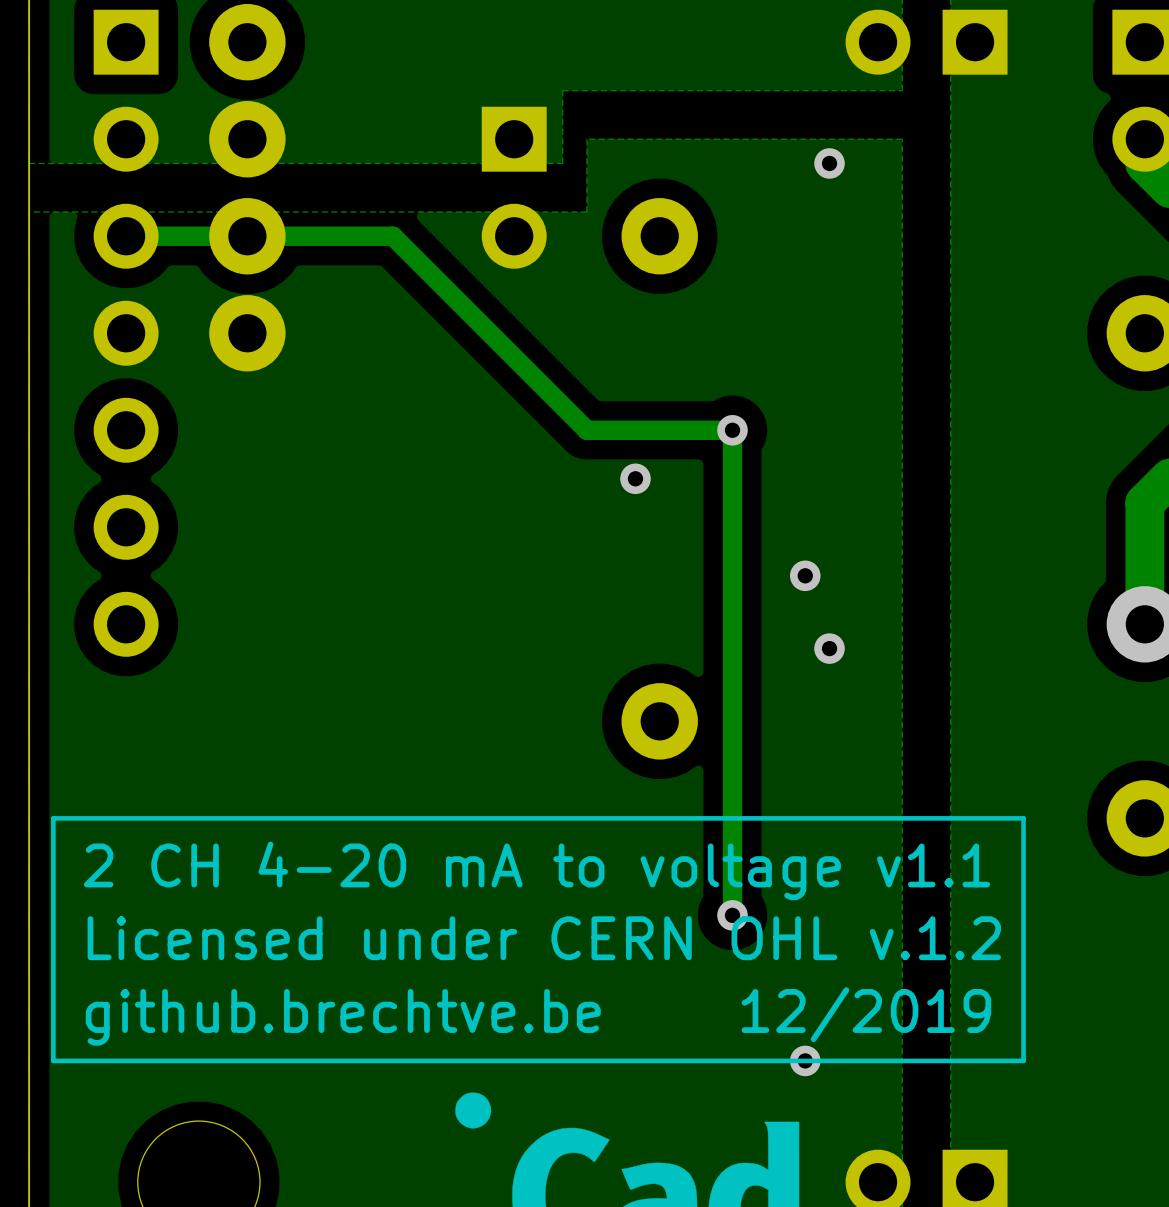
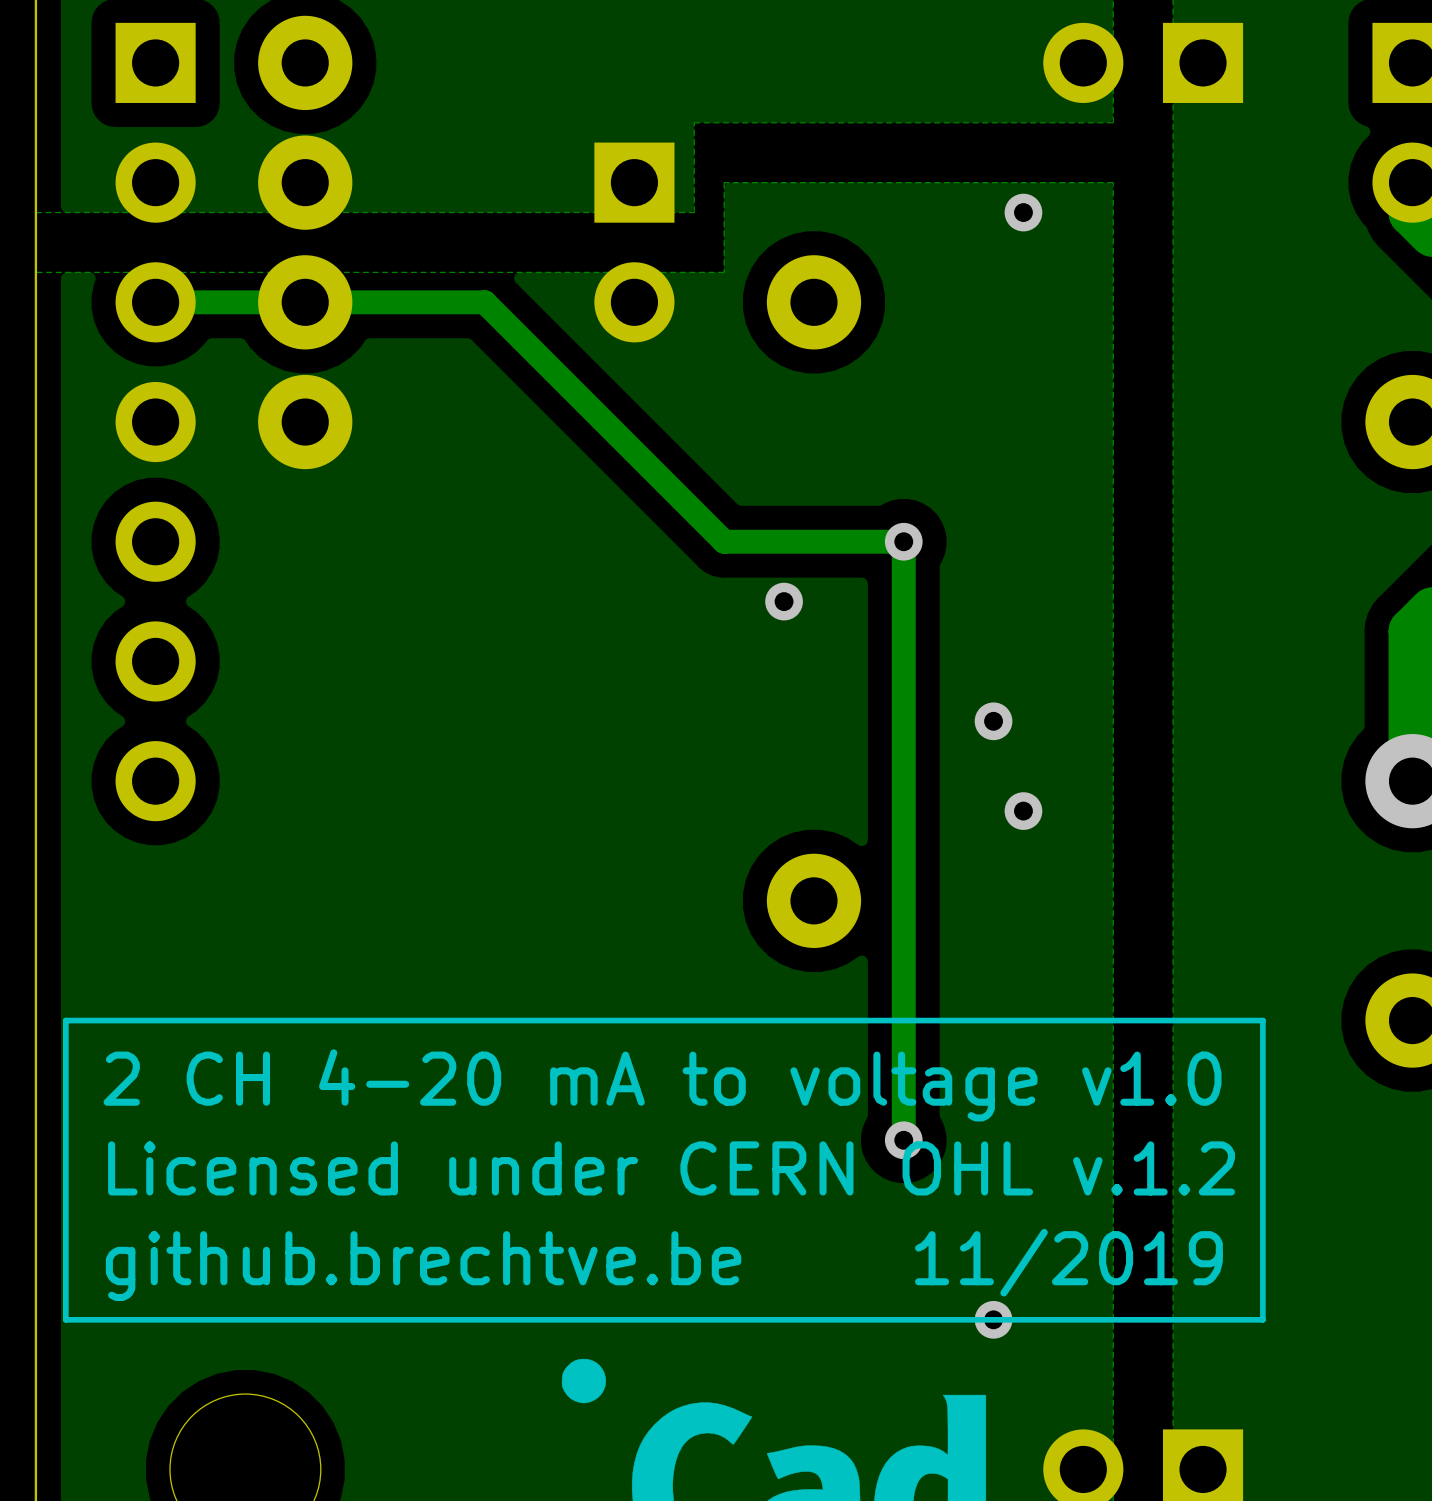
text: 2 CH 4-20 mA to voltage v1.1 (537, 870) -> 2 CH 4-20 mA to voltage v1.0 (662, 1085)
text: 12/2019 (866, 1014) -> 11/2019 (1068, 1262)

